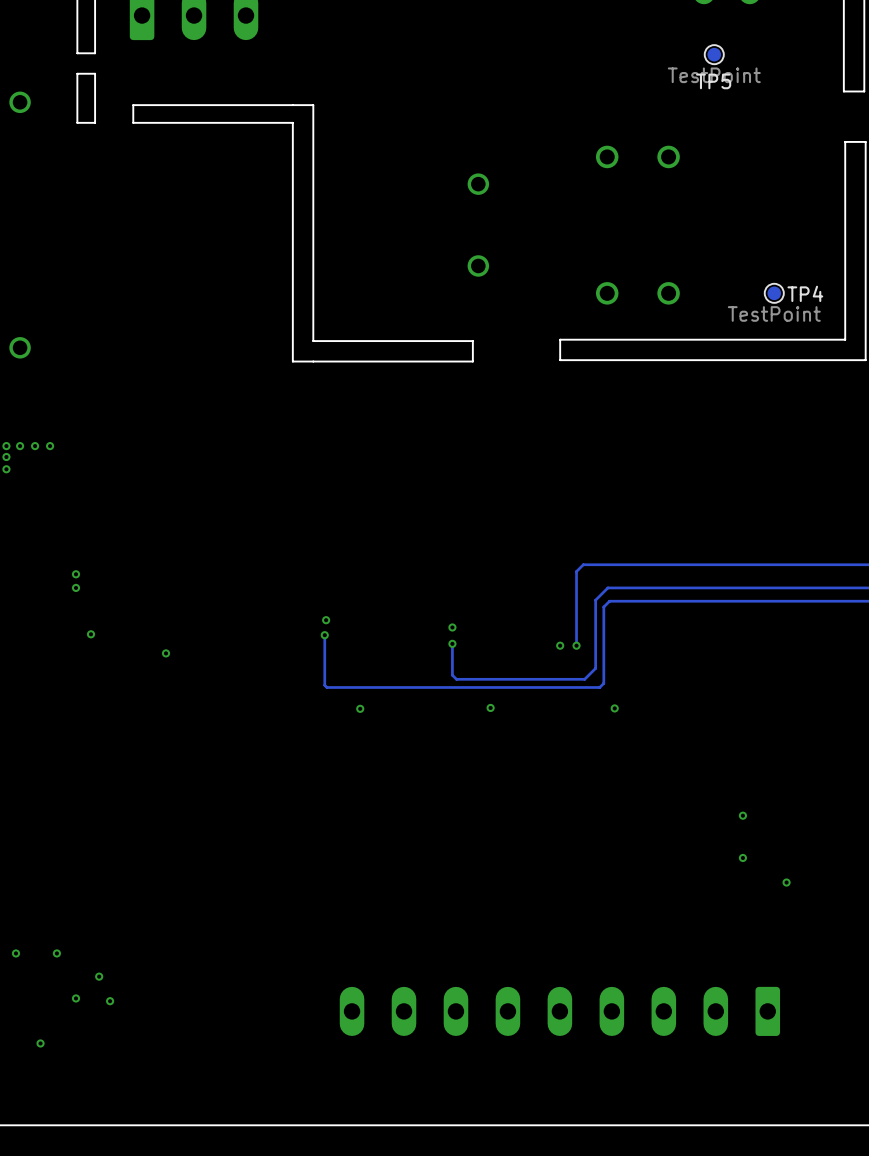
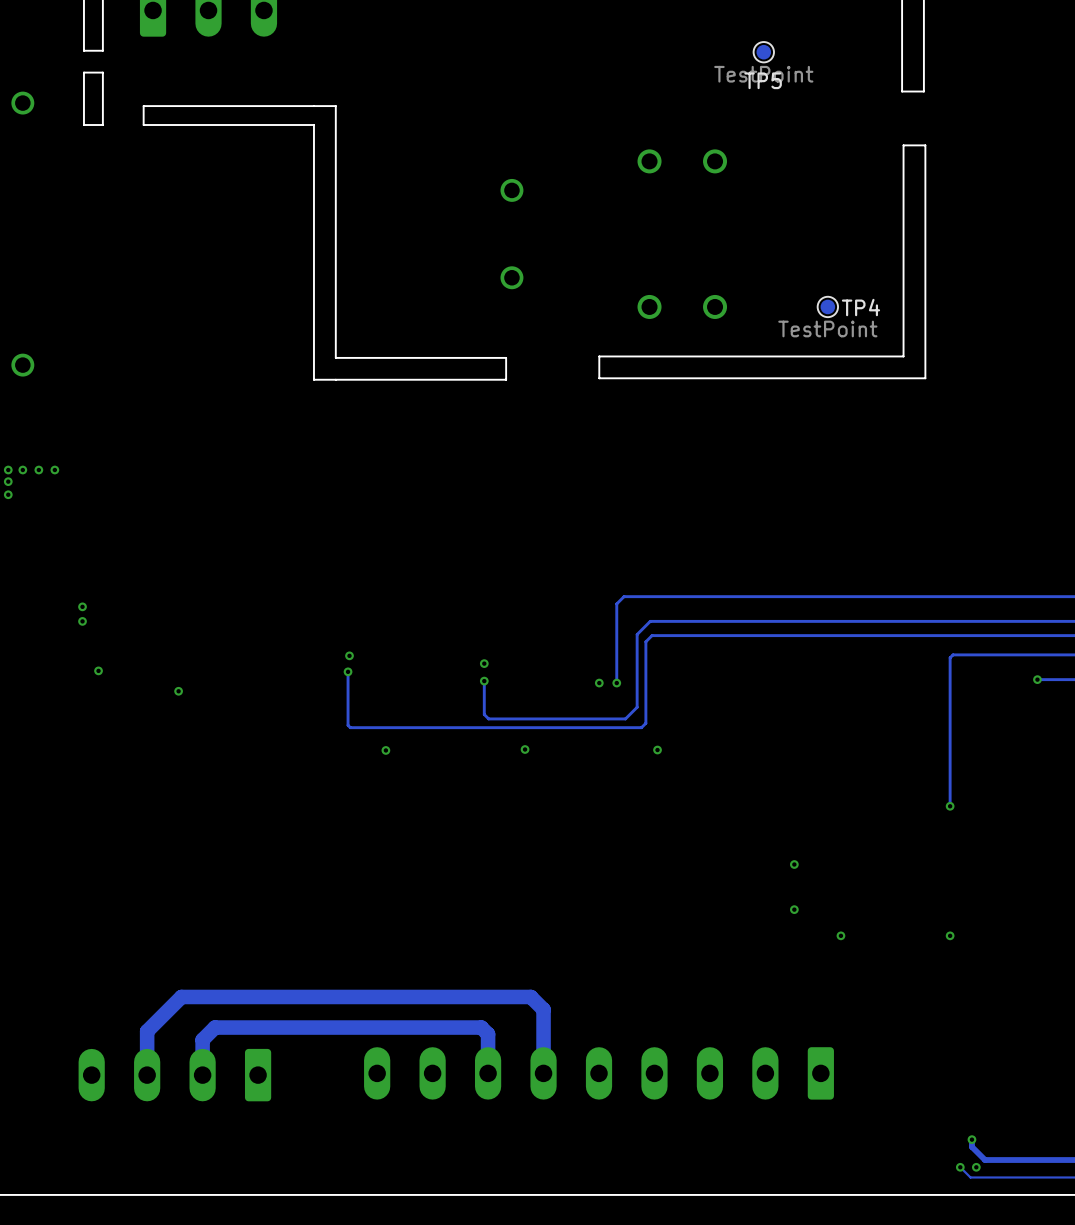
via: (15, 953) -> none
via: (56, 953) -> none
via: (99, 976) -> none
via: (75, 998) -> none
via: (110, 1001) -> none
track: none -> (488, 1073) (488, 1034) (481, 1027) (214, 1027) (202, 1039) (202, 1075)
track: none -> (543, 1073) (543, 1009) (530, 996) (181, 996) (147, 1031) (147, 1075)
part: none -> (174, 1075)
via: (40, 1043) -> none

